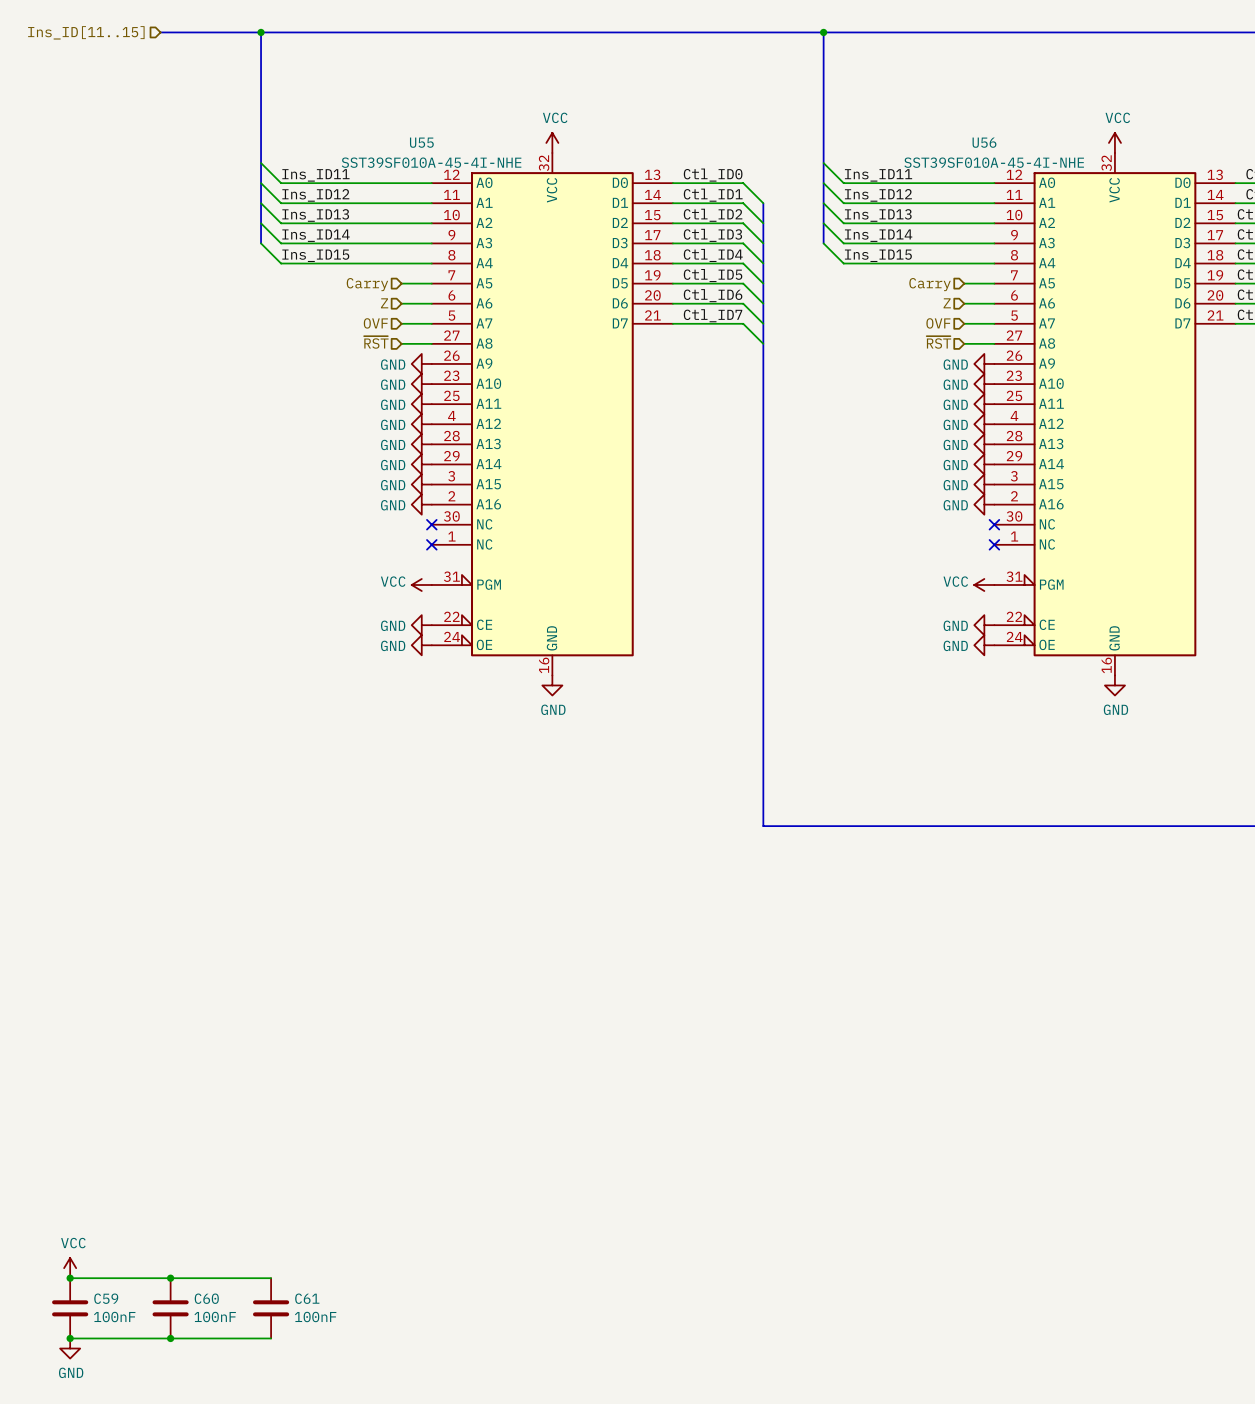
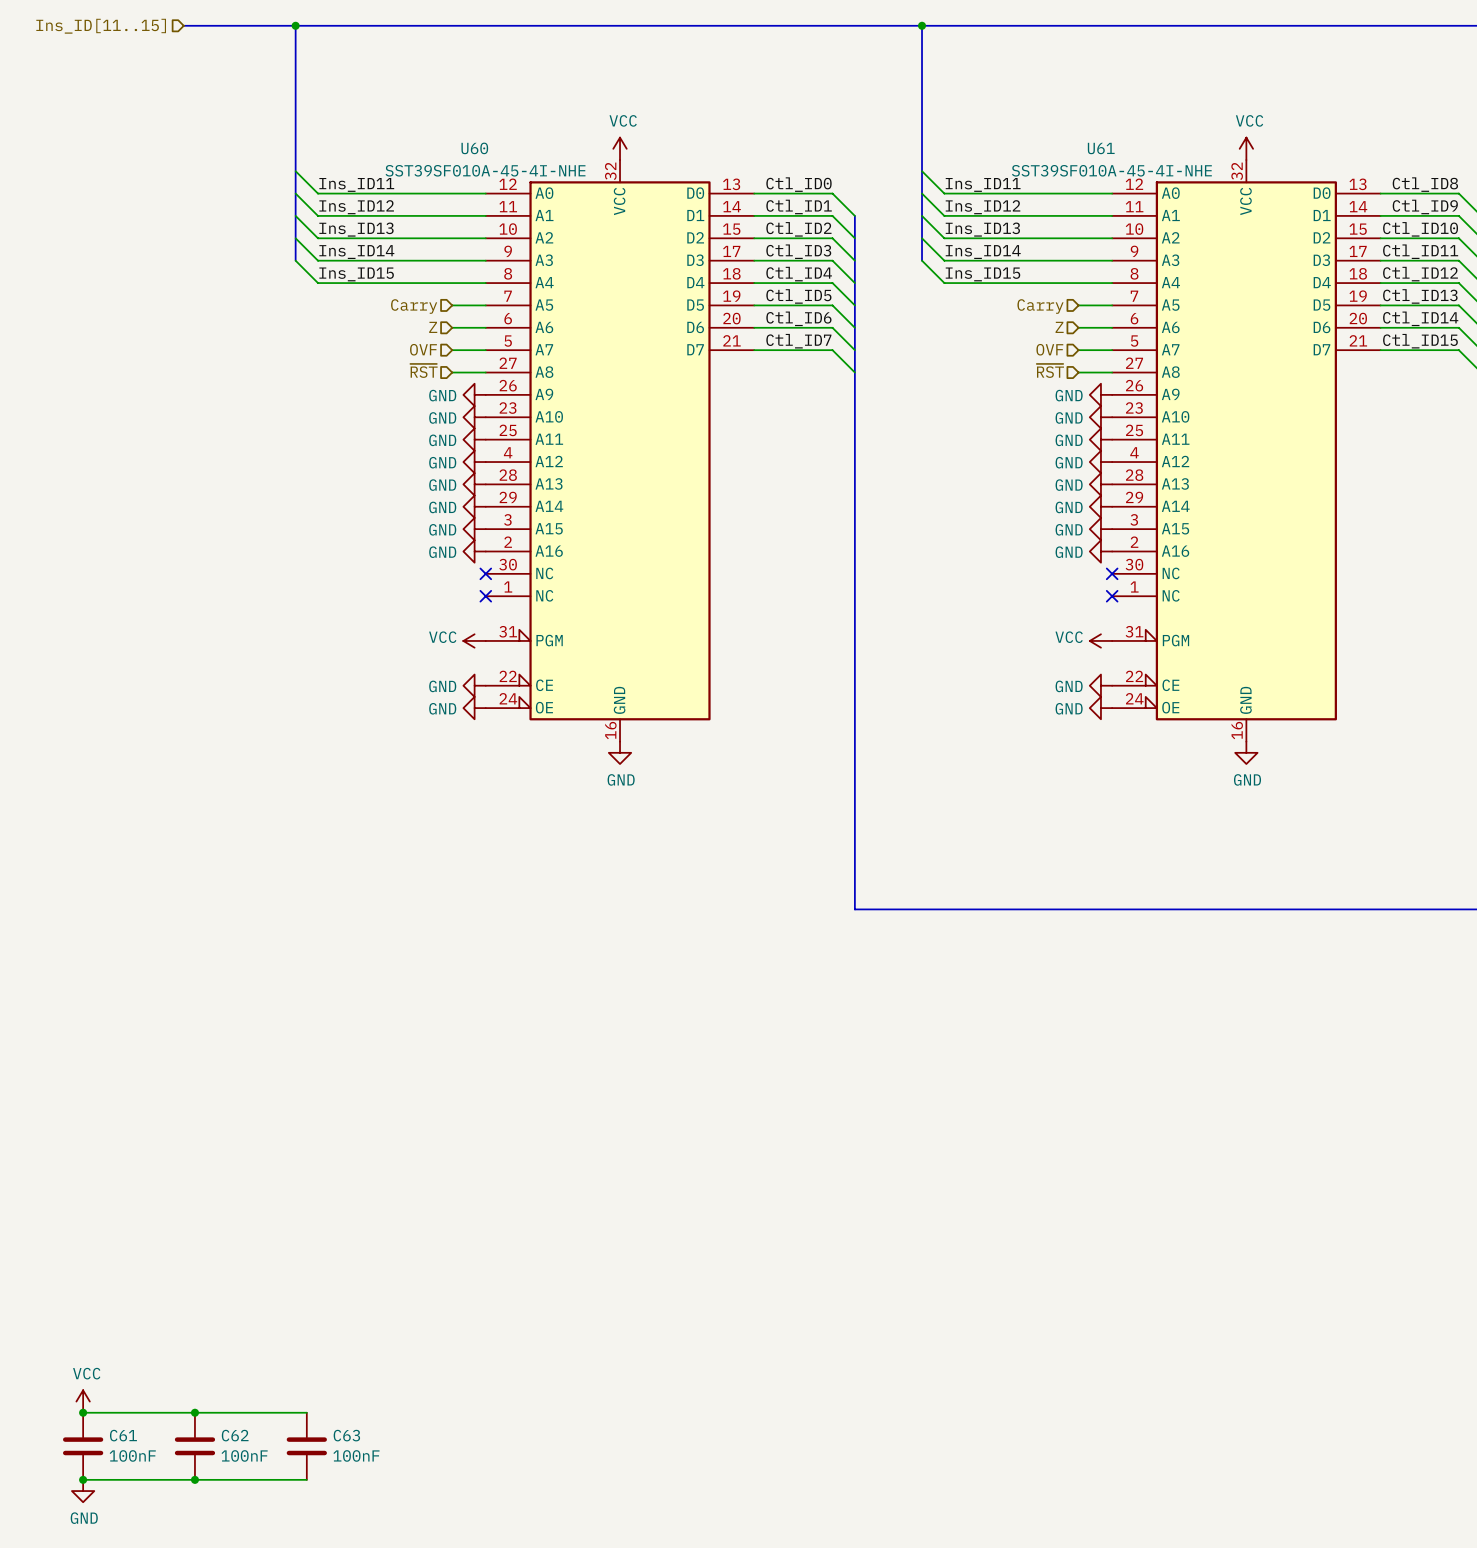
U55 name: U55 (421, 142) -> U60 (474, 148)
U56 name: U56 (984, 142) -> U61 (1101, 148)
C59 name: C59 (106, 1298) -> C61 (123, 1435)
C60 name: C60 (206, 1298) -> C62 (235, 1435)
C61 name: C61 (307, 1298) -> C63 (346, 1435)

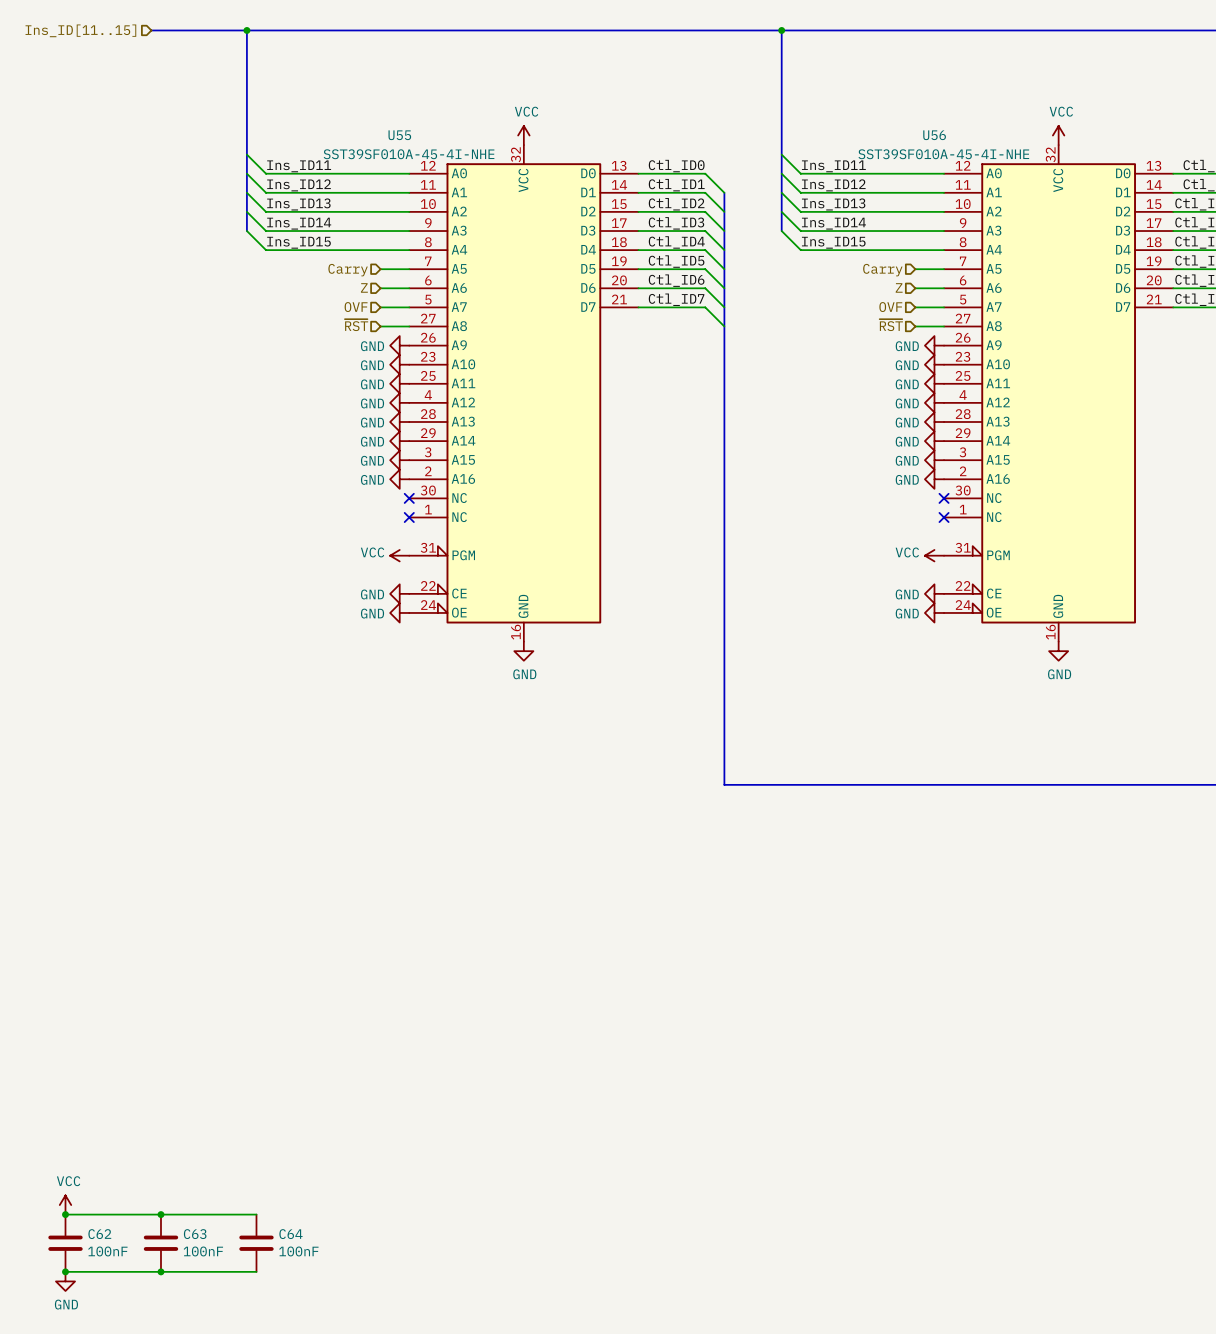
U60 name: U60 (474, 148) -> U55 (399, 135)
U61 name: U61 (1101, 148) -> U56 (934, 135)
C61 name: C61 (123, 1435) -> C62 (99, 1234)
C62 name: C62 (235, 1435) -> C63 (195, 1234)
C63 name: C63 (346, 1435) -> C64 (290, 1234)

